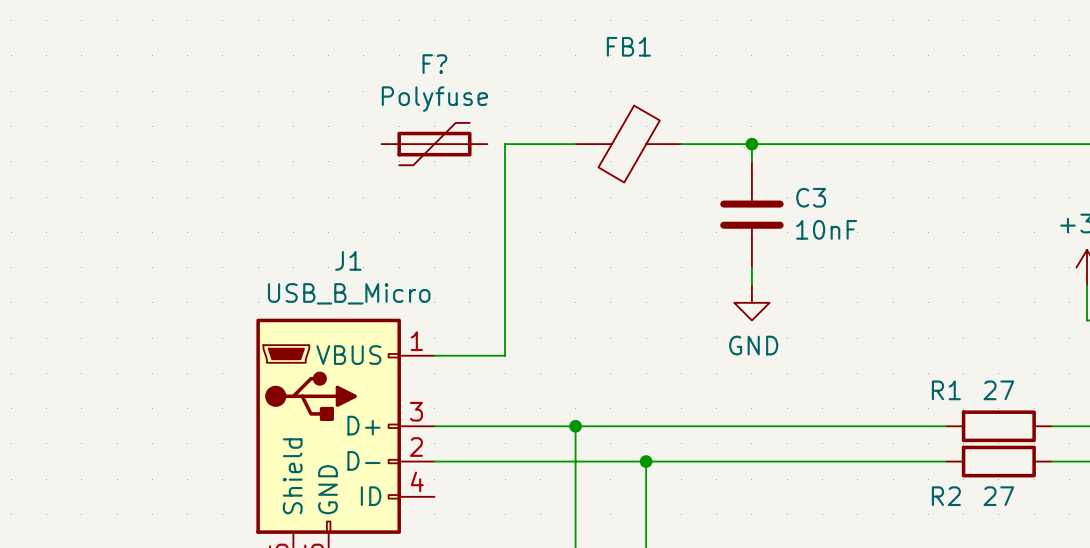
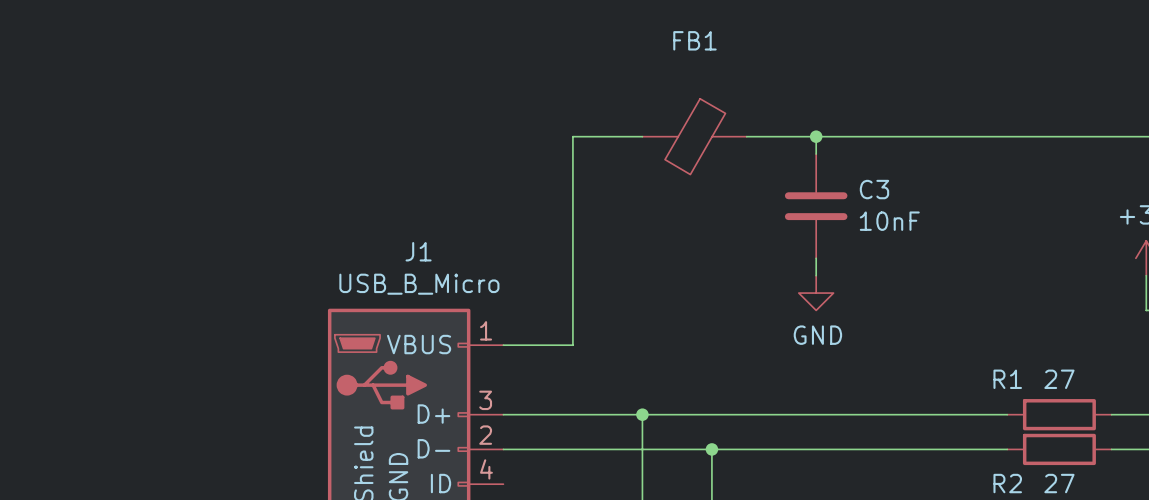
F?: Polyfuse (434, 144) -> none

